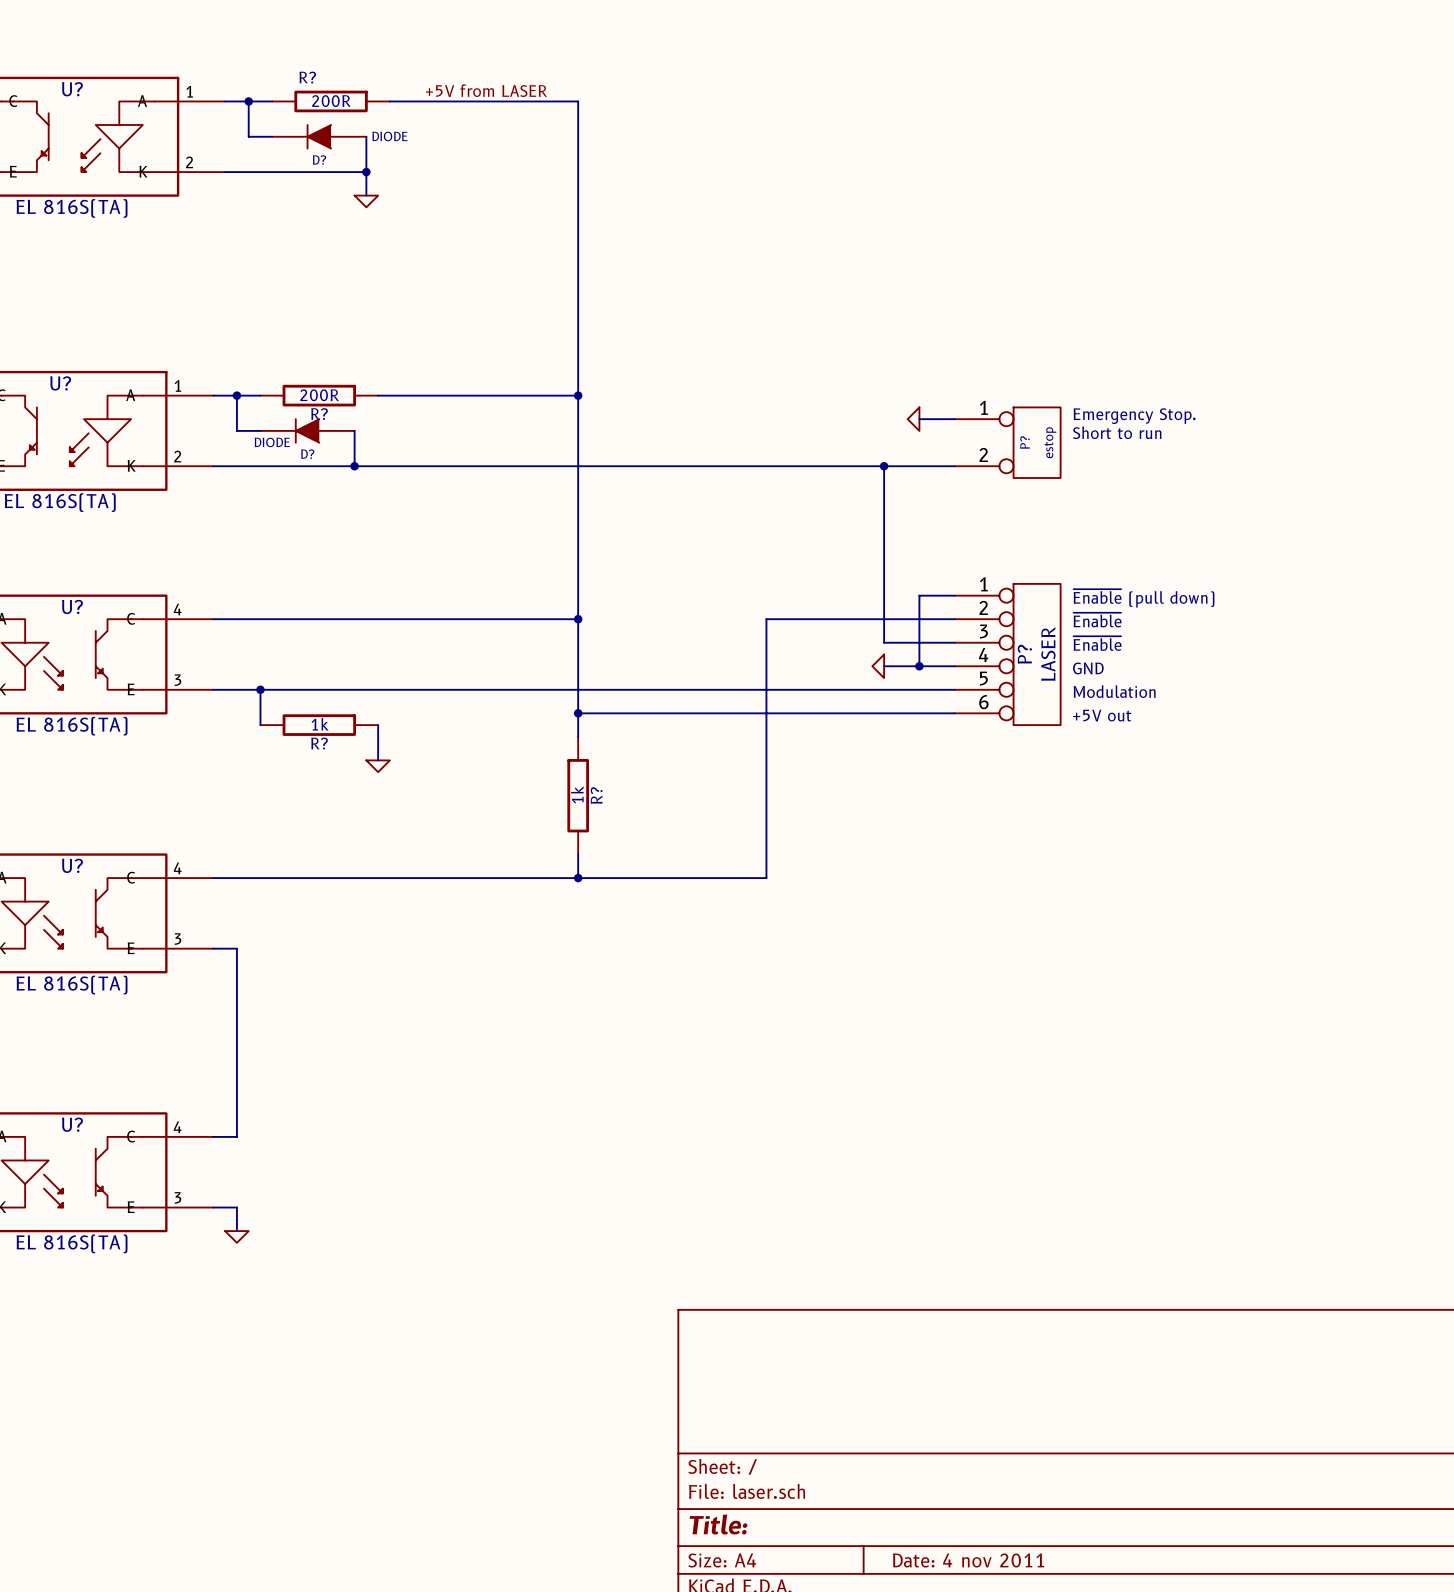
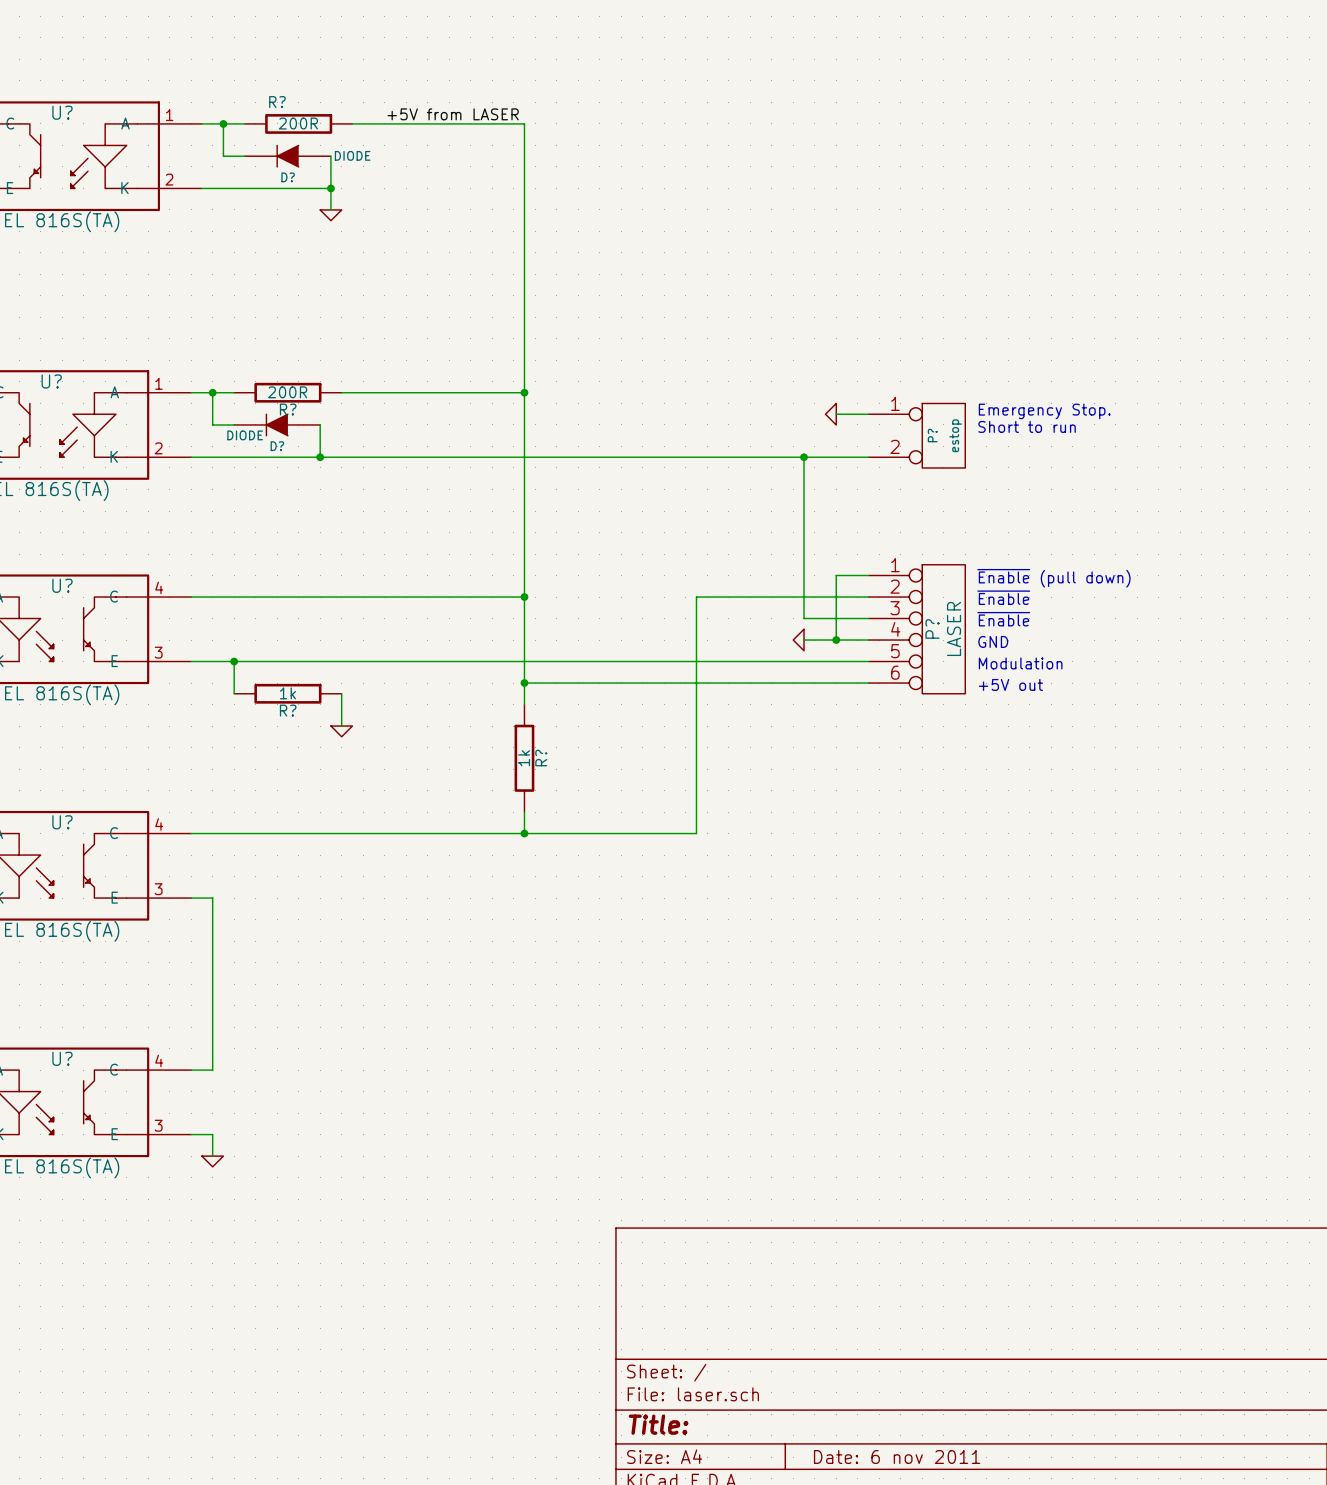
title block: Date: 4 nov 2011 (968, 1560) -> Date: 6 nov 2011 (897, 1457)

